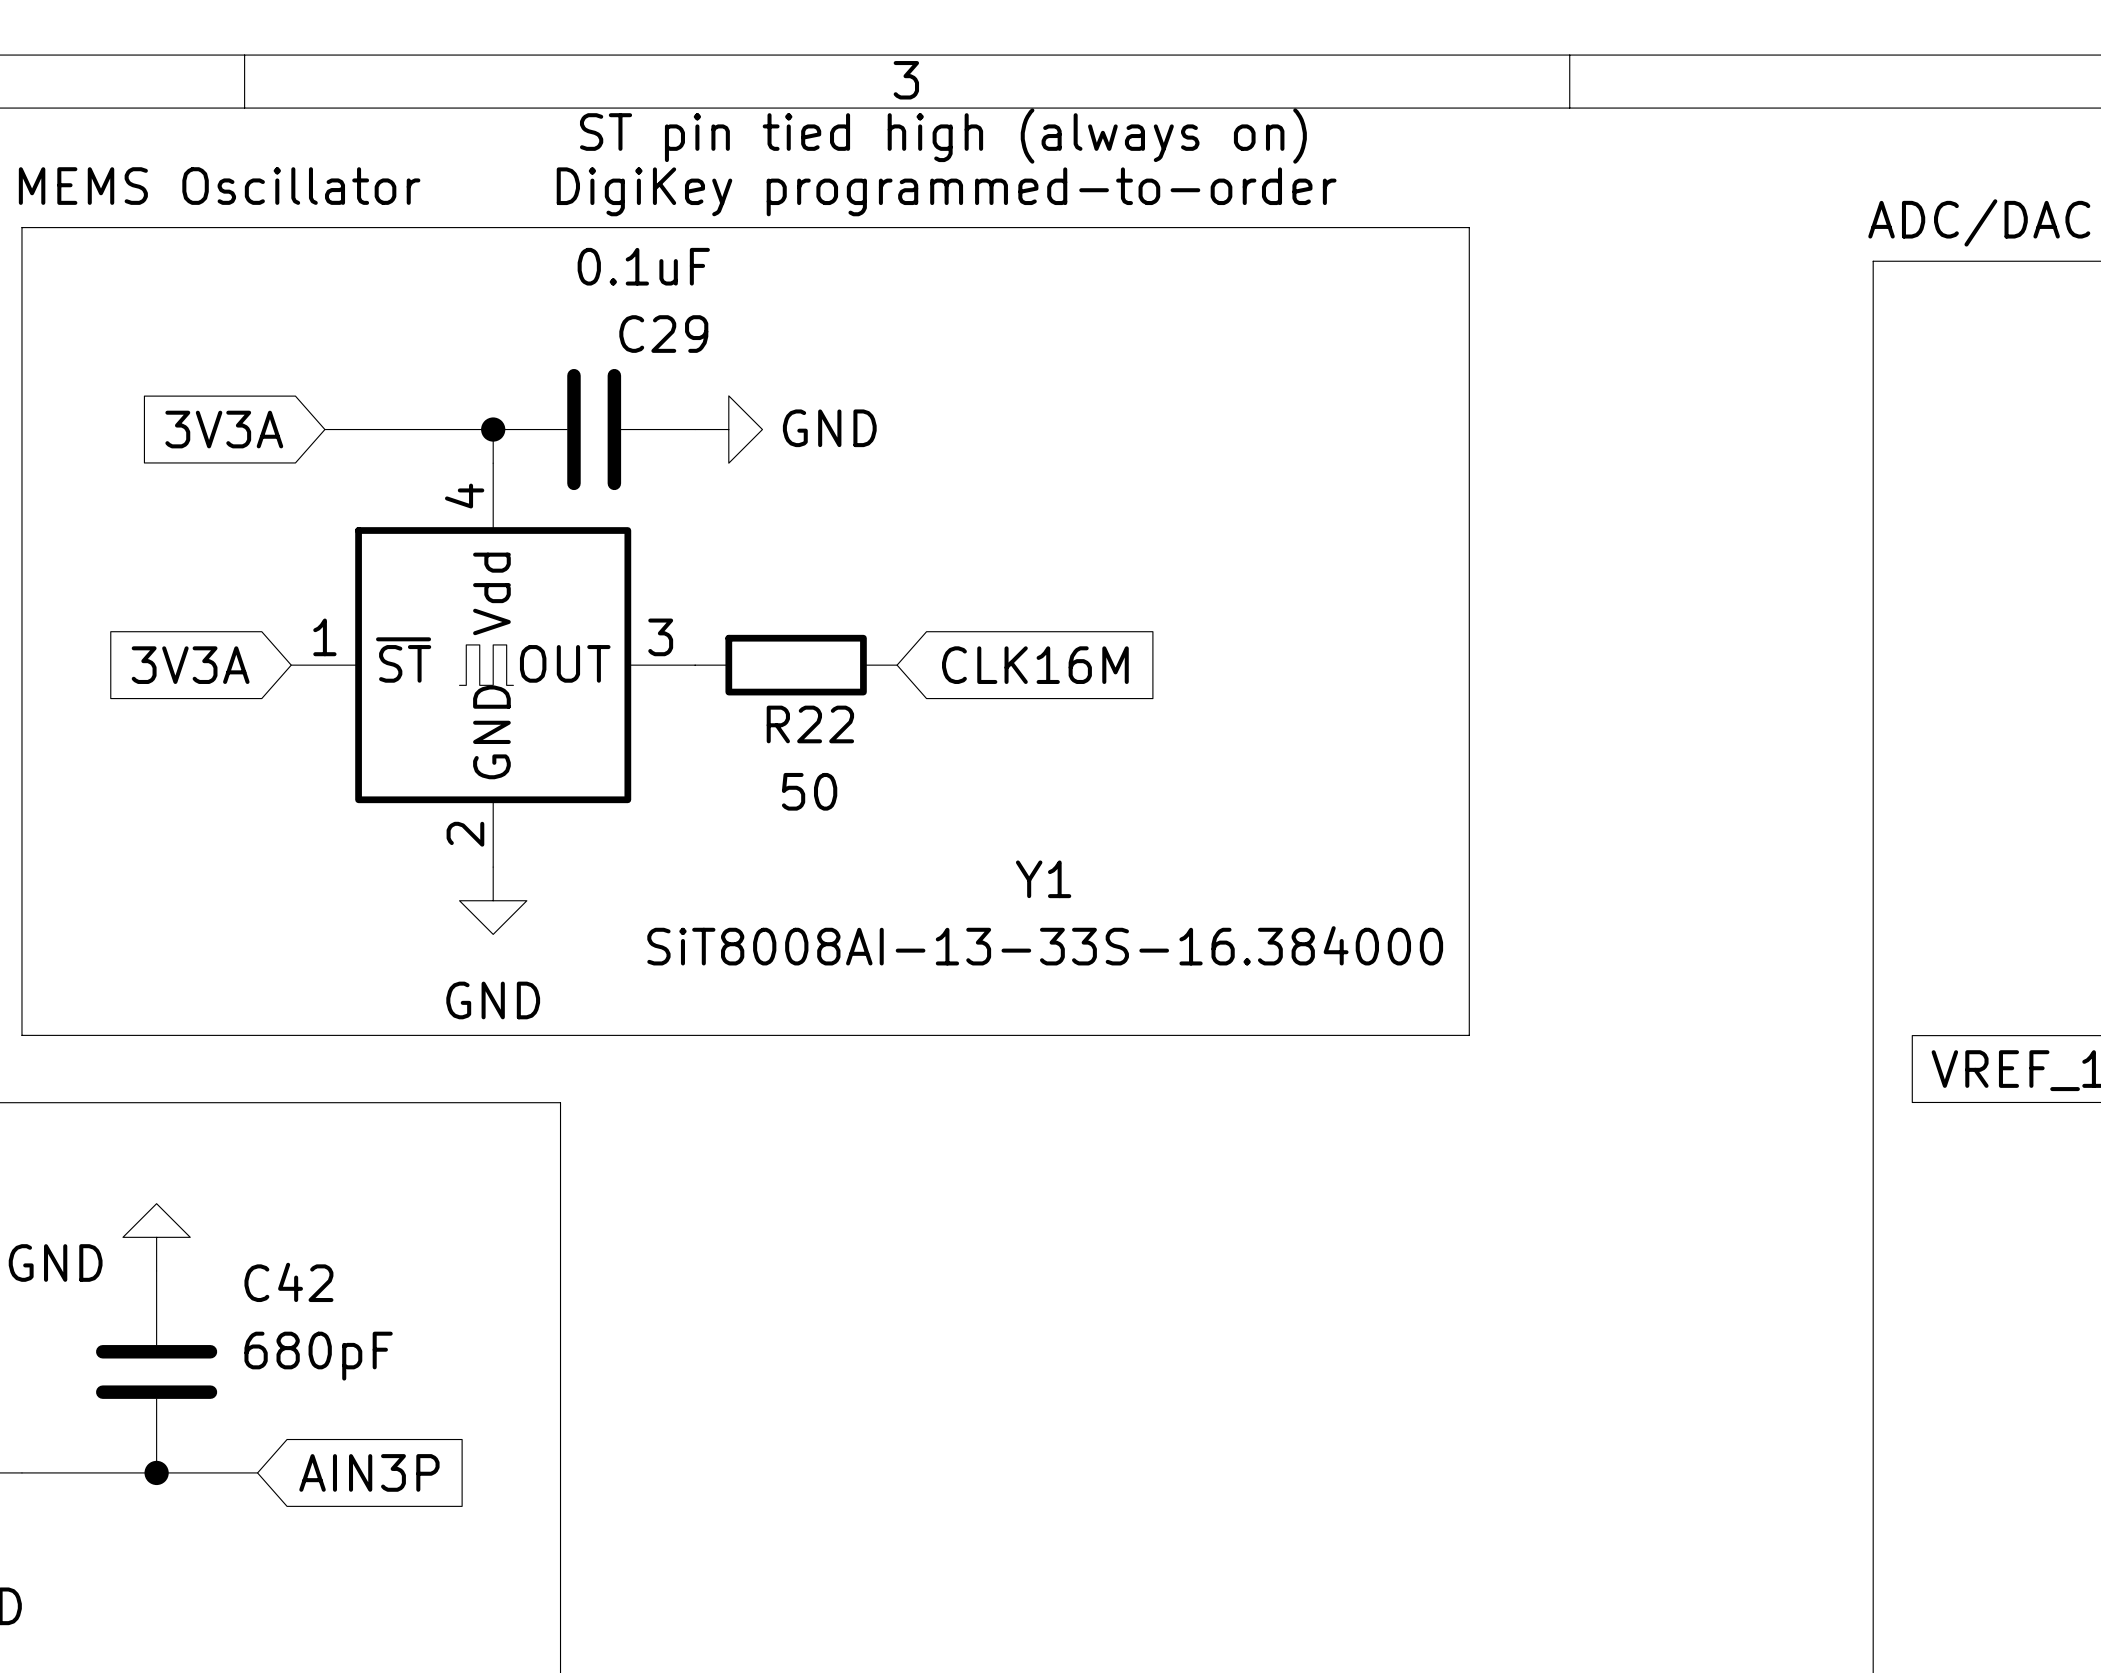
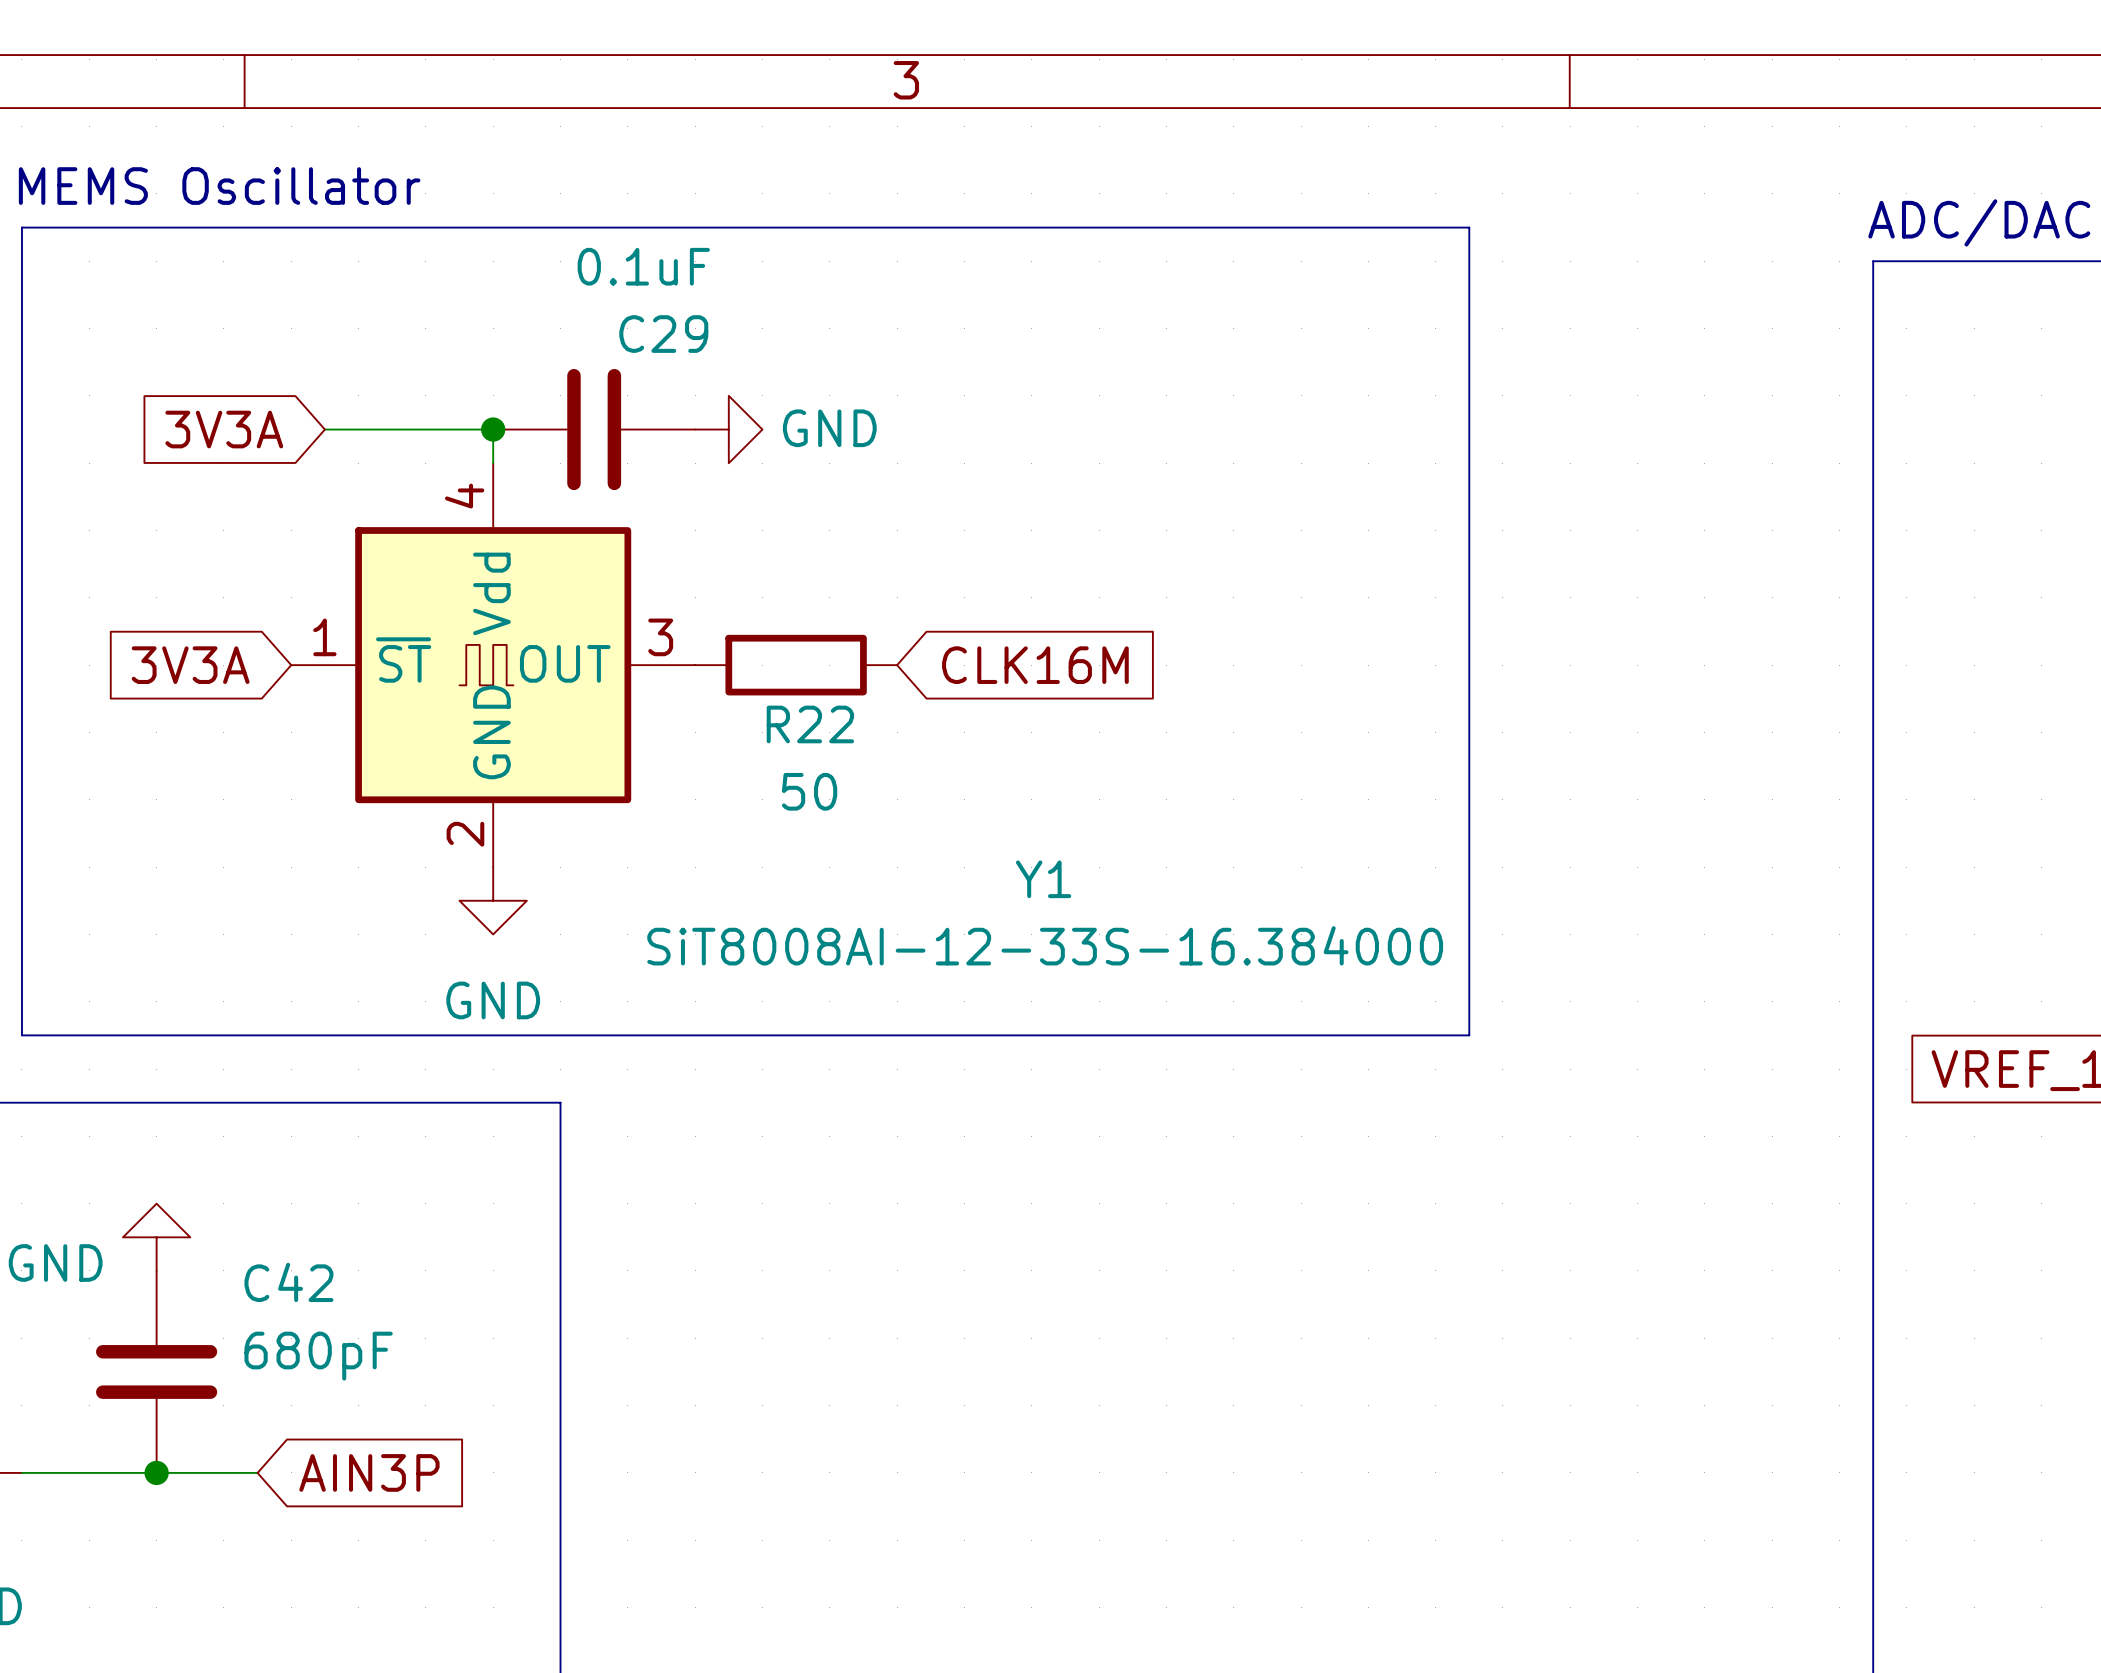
text: ST pin tied high (always on) (943, 136) -> none
text: DigiKey programmed-to-order (946, 191) -> none
Y1 value: SiT8008AI-13-33S-16.384000 (1045, 945) -> SiT8008AI-12-33S-16.384000 (1045, 945)

